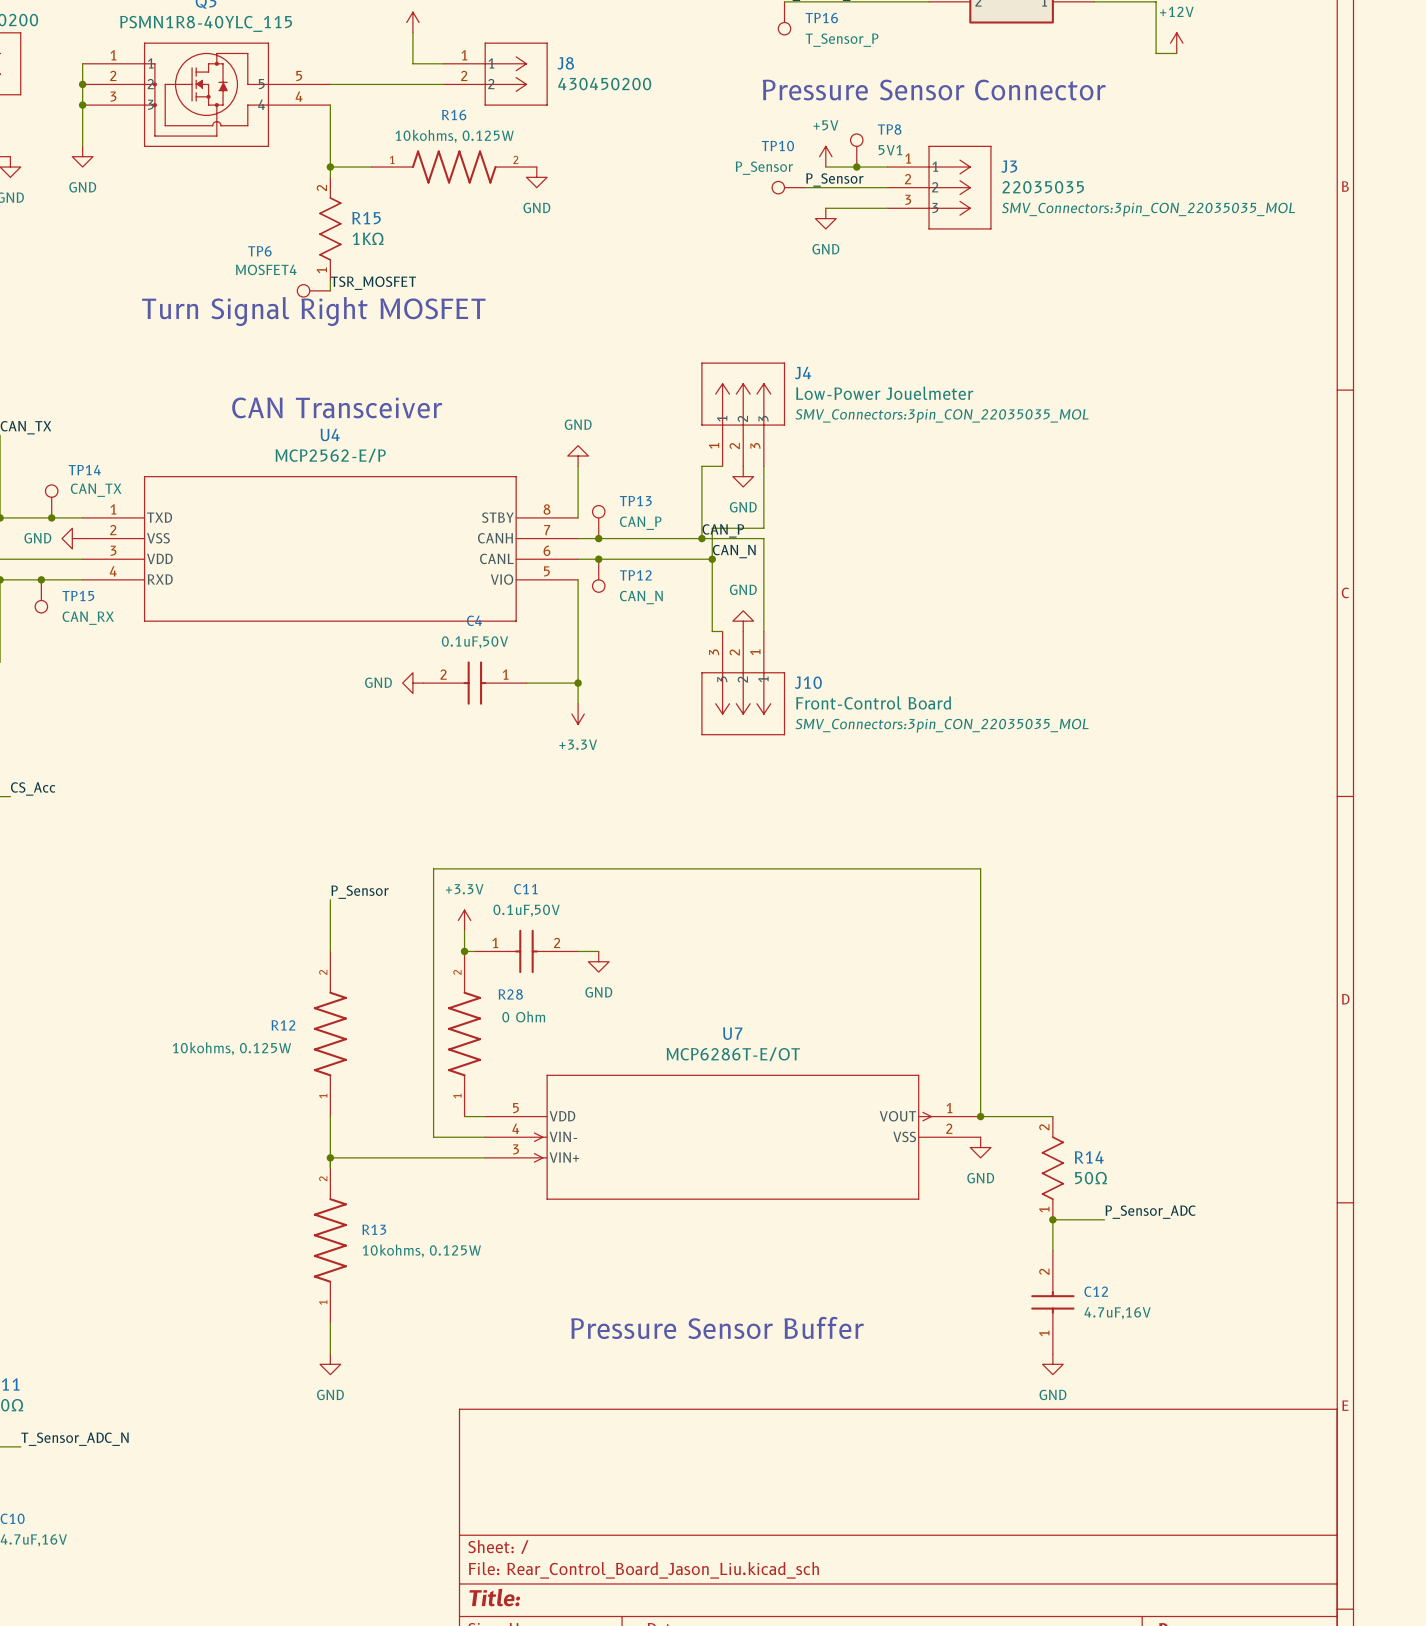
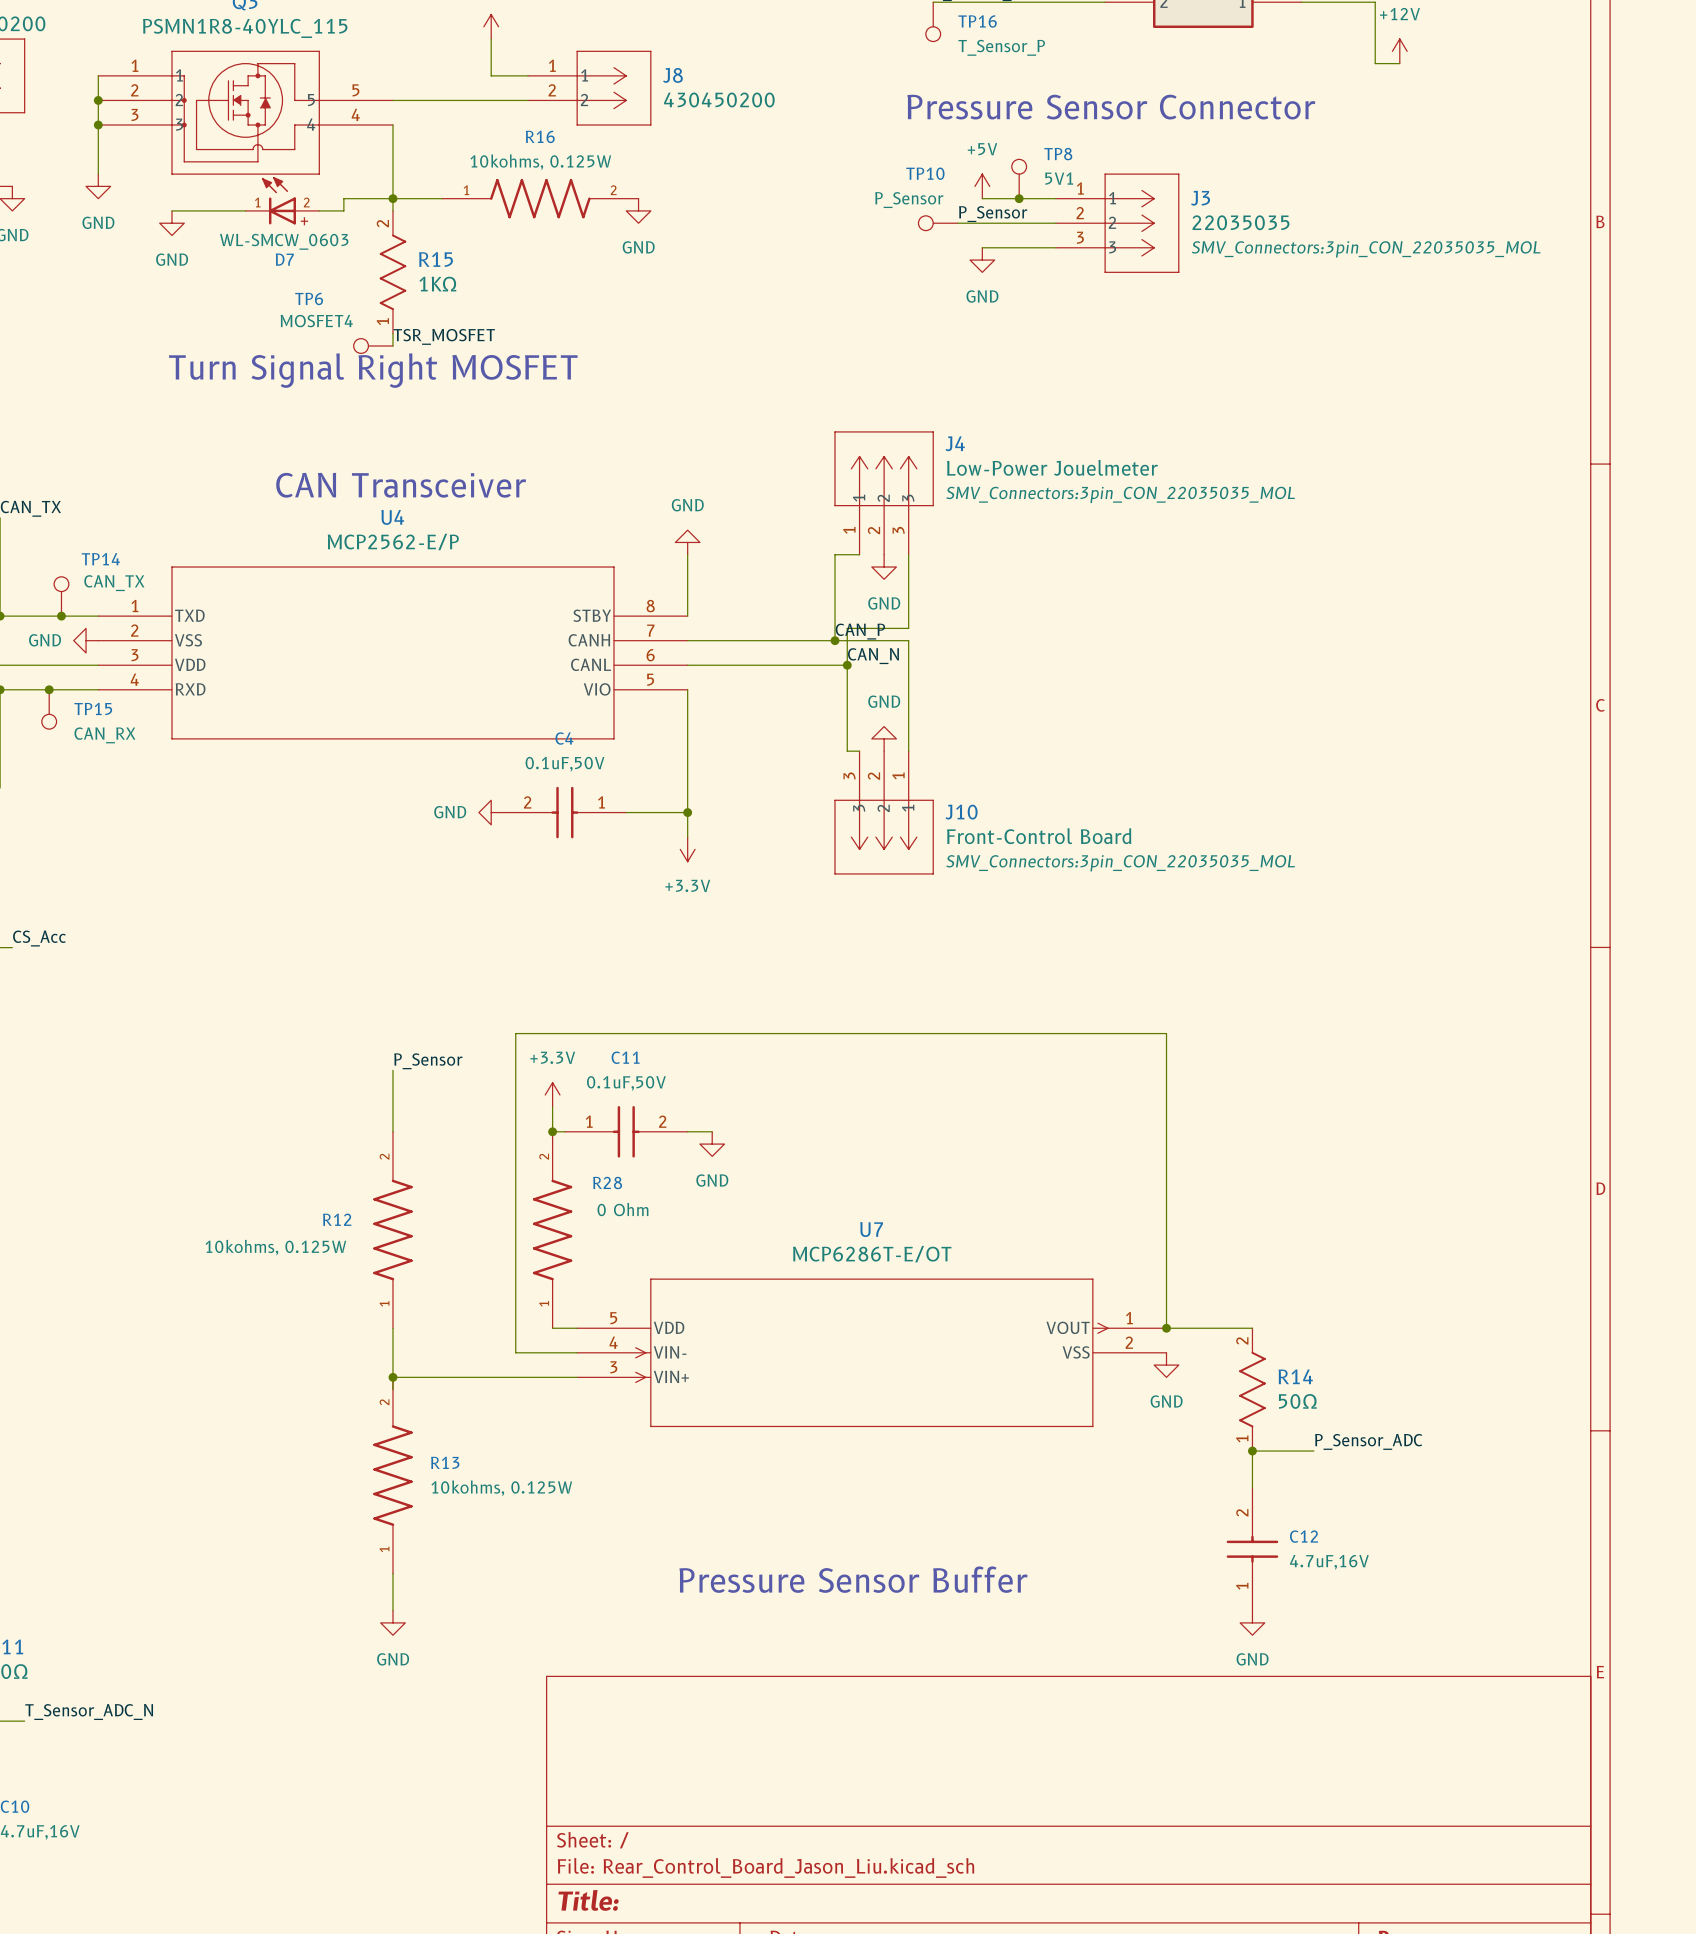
wire: none -> (392, 198) (343, 198) (343, 210) (319, 210)
D7: none -> WL-SMCW_0603 (282, 200)
wire: none -> (171, 210) (245, 210)
power symbol: none -> GND (171, 223)
TP13: CAN_P (598, 522) -> none
junction: (598, 538) -> none
junction: (598, 559) -> none
TP12: CAN_N (598, 575) -> none

